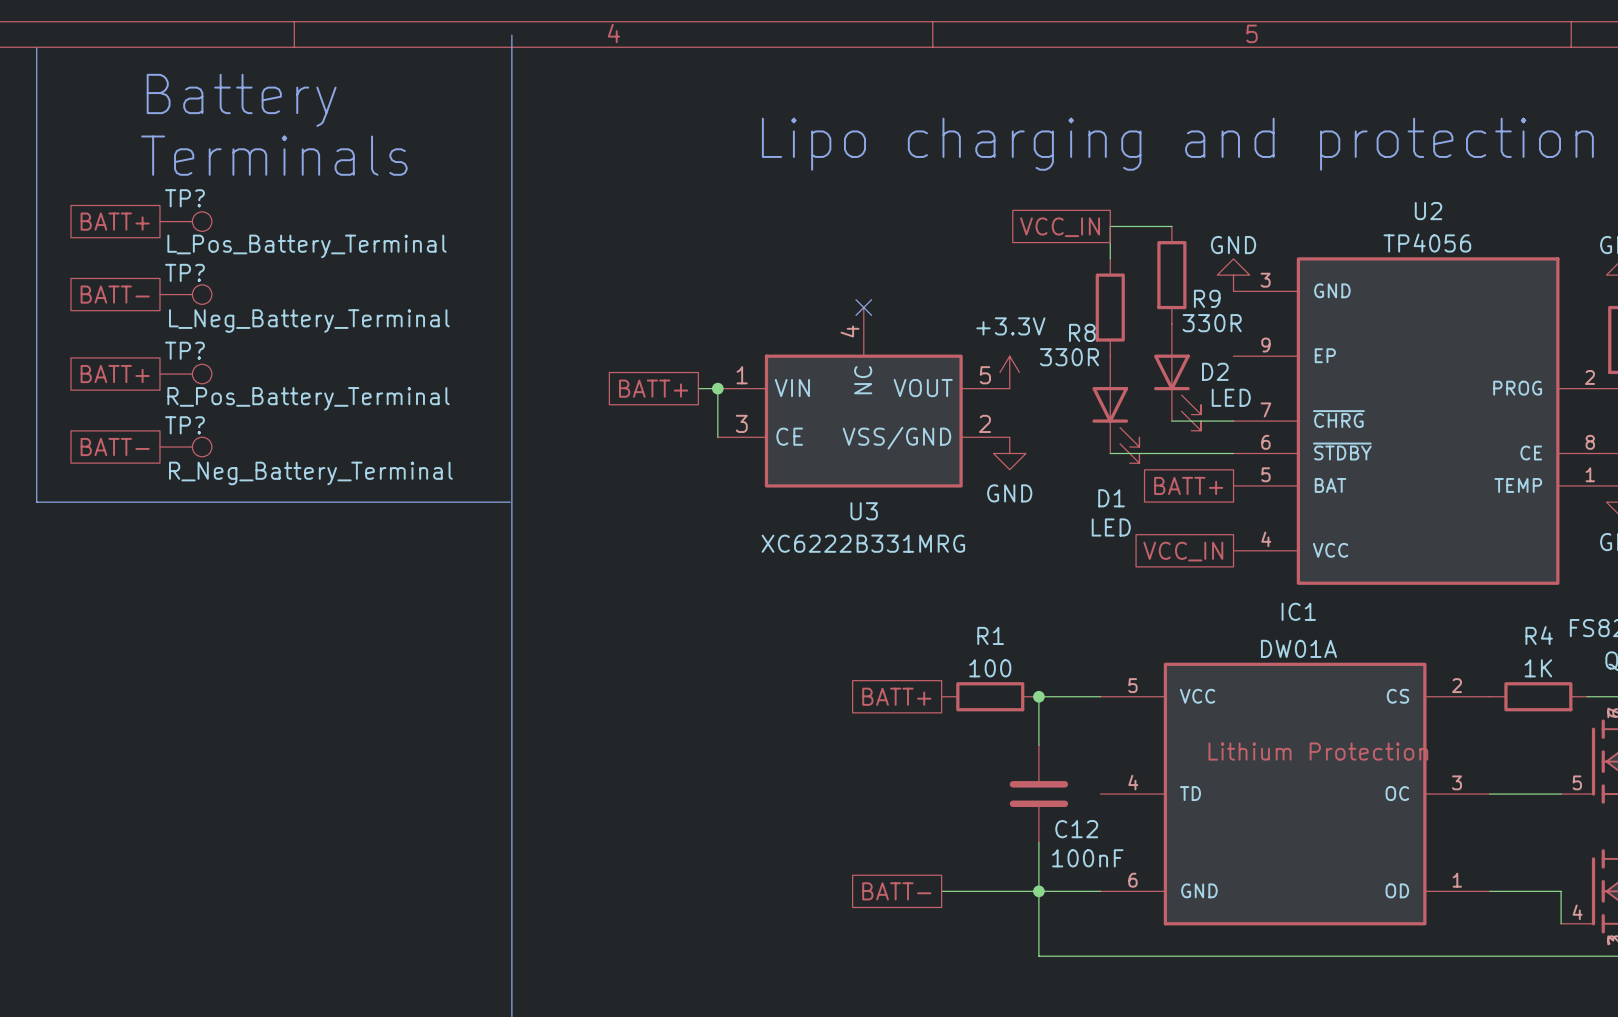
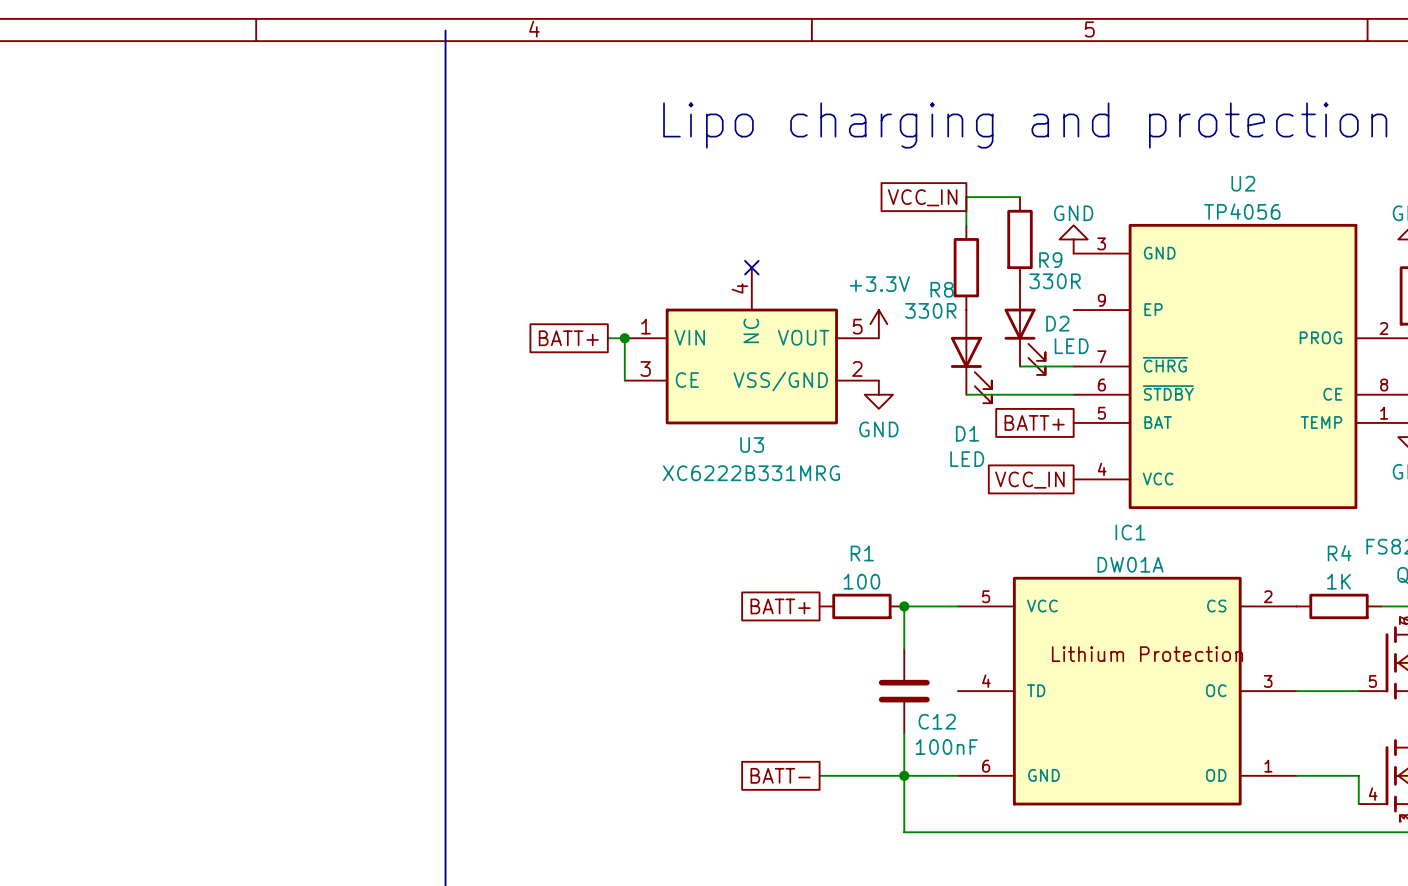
line: (36, 48) (36, 502) (510, 502) -> none
text: Battery (241, 100) -> none
text: Terminals (274, 155) -> none
global label: BATT+ (115, 221) -> none
TP?: L_Pos_Battery_Terminal (185, 221) -> none
global label: BATT- (115, 294) -> none
TP?: L_Neg_Battery_Terminal (185, 294) -> none
global label: BATT+ (115, 374) -> none
TP?: R_Pos_Battery_Terminal (185, 374) -> none
global label: BATT- (115, 447) -> none
TP?: R_Neg_Battery_Terminal (185, 447) -> none

